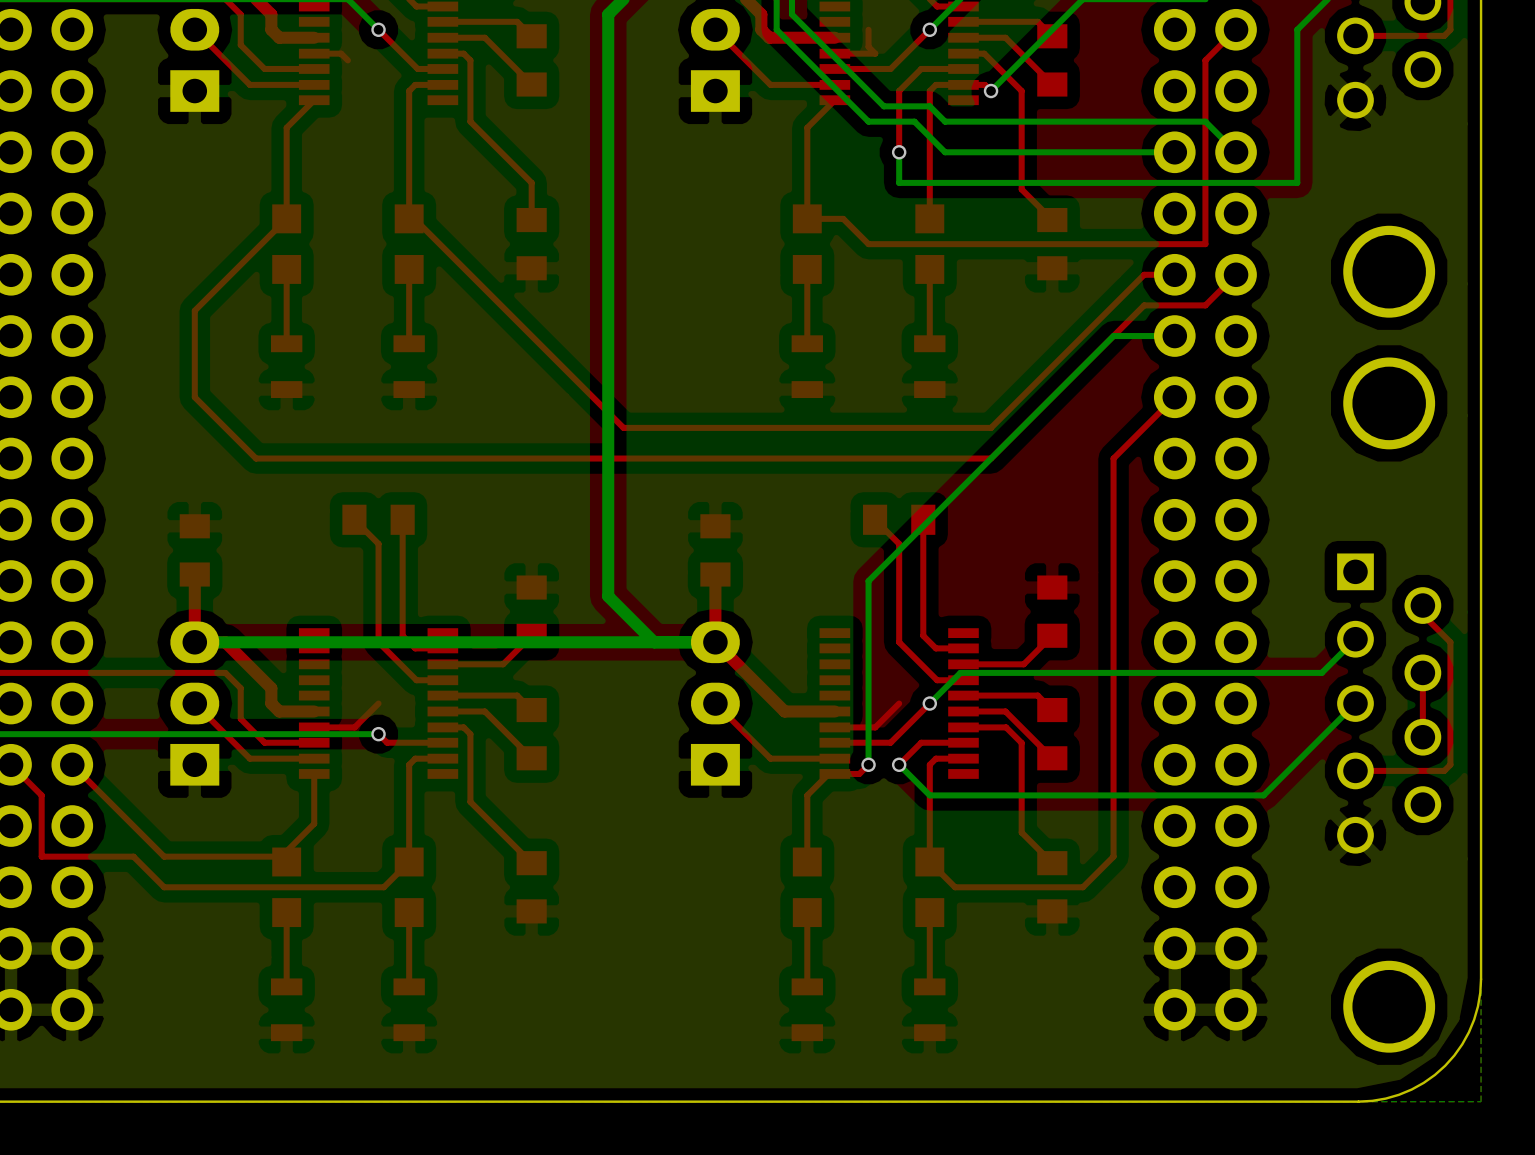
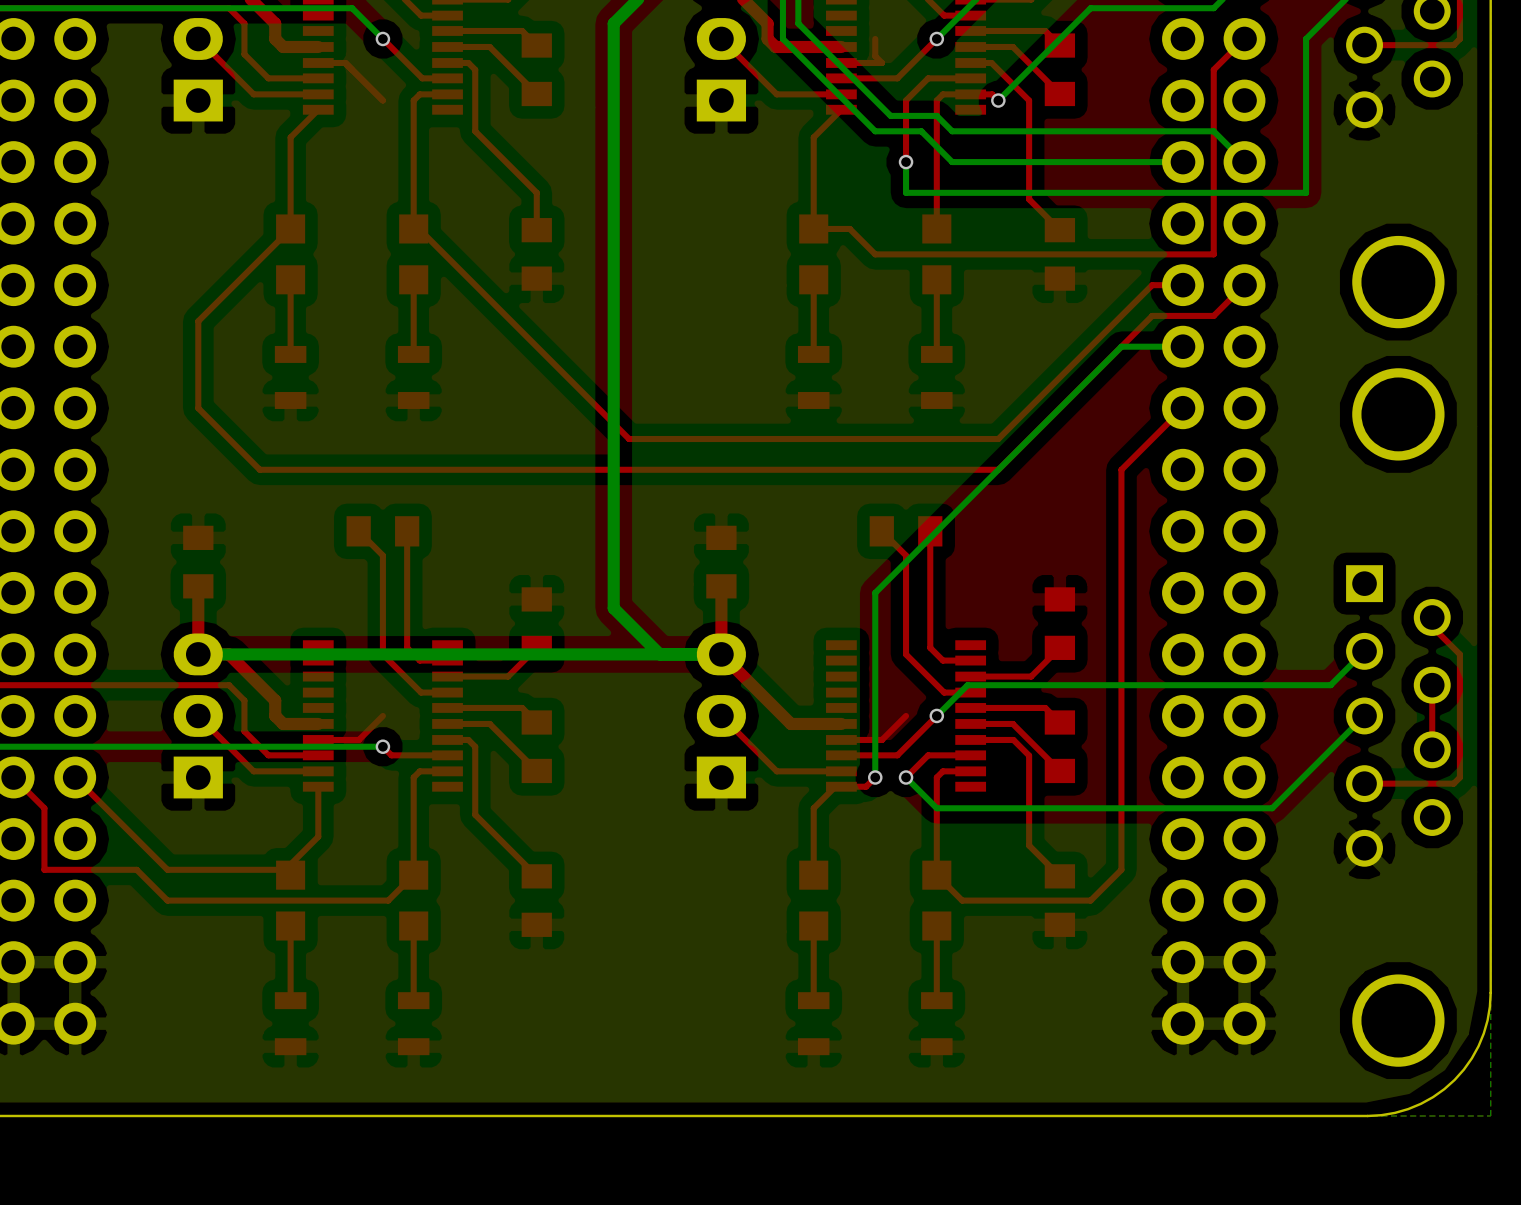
top track: none -> (352, 69) (382, 100)

